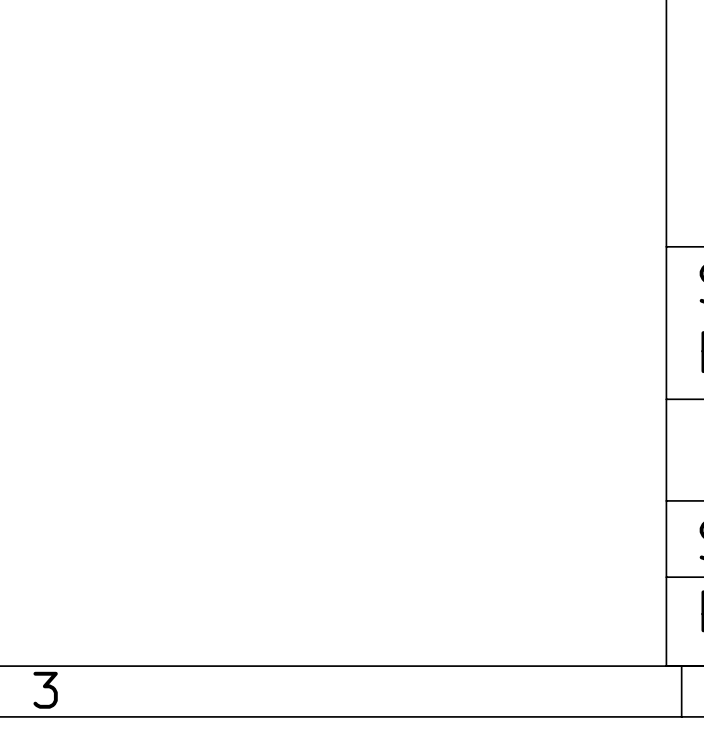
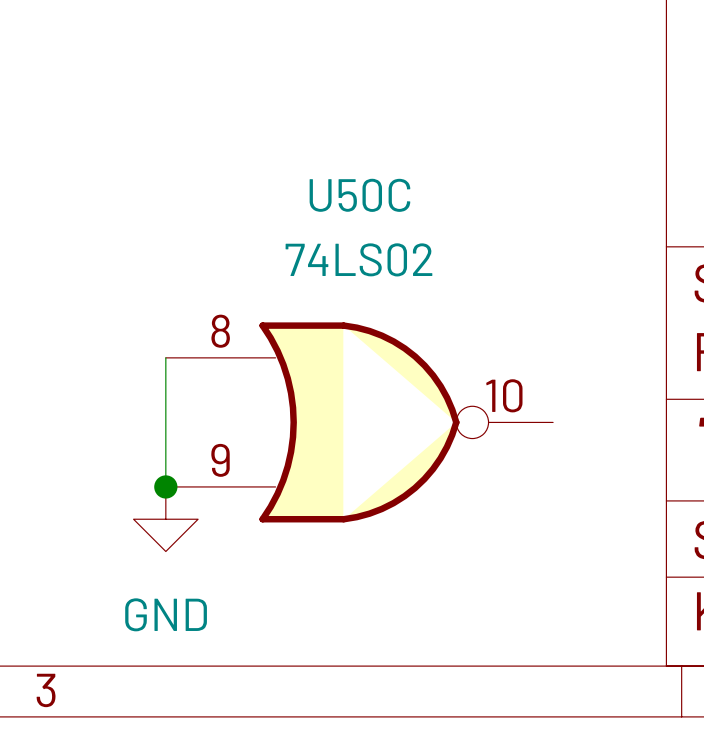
wire: none -> (165, 357) (165, 486)
U50C: none -> 74LS02 (359, 422)
junction: none -> (165, 486)
power symbol: none -> GND (165, 519)

